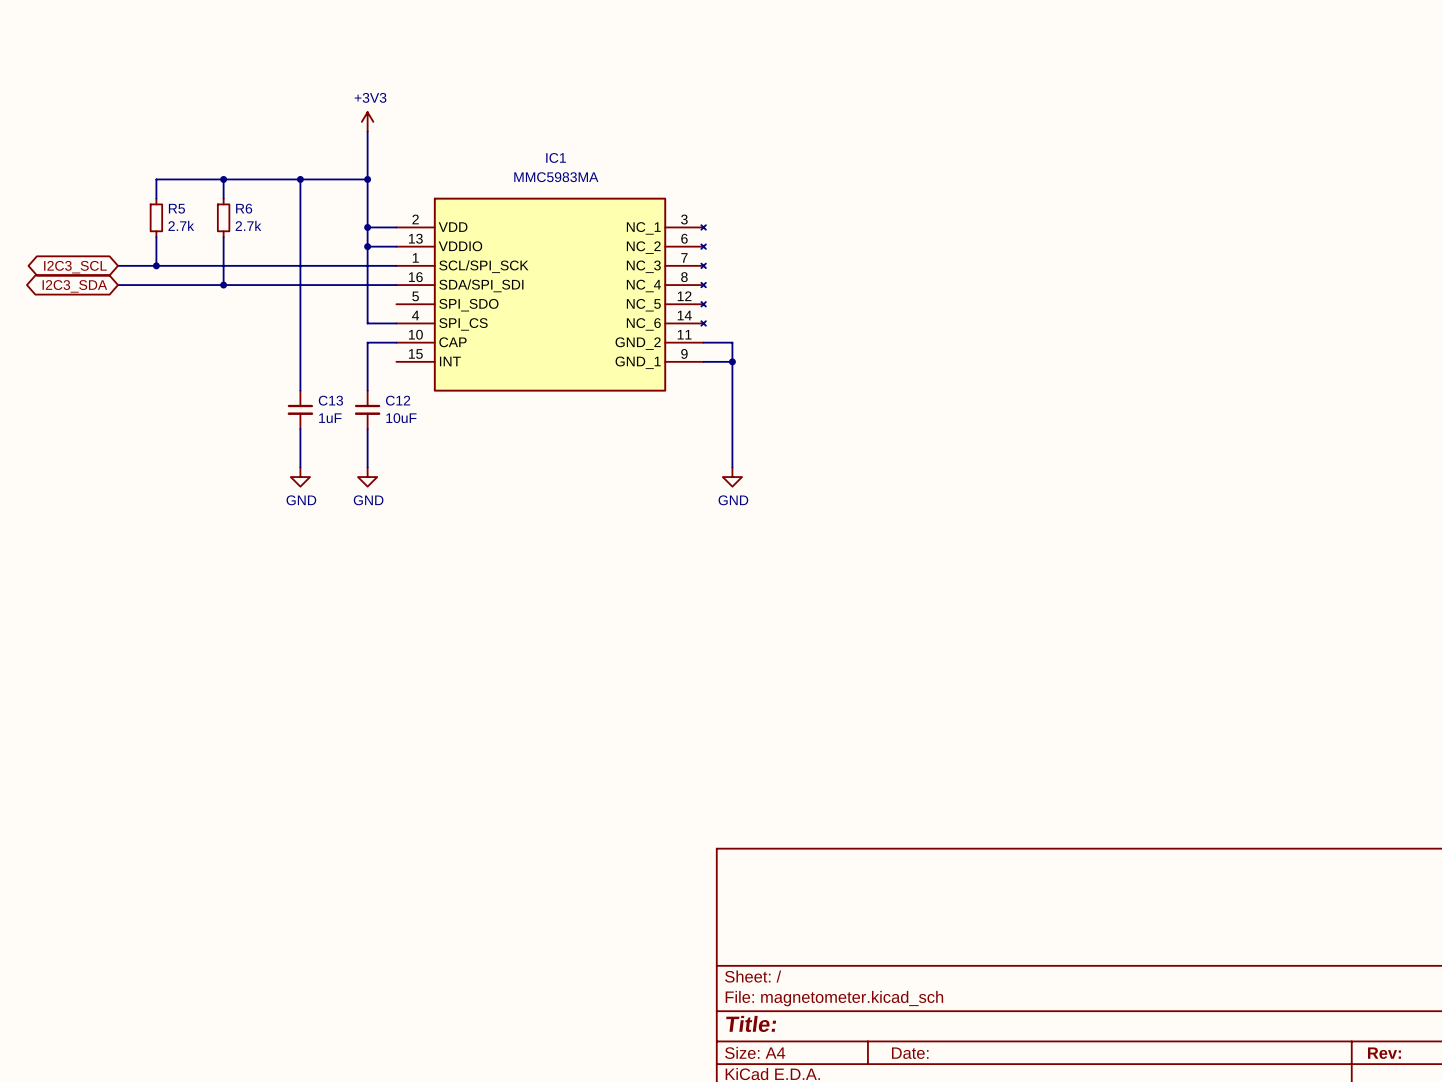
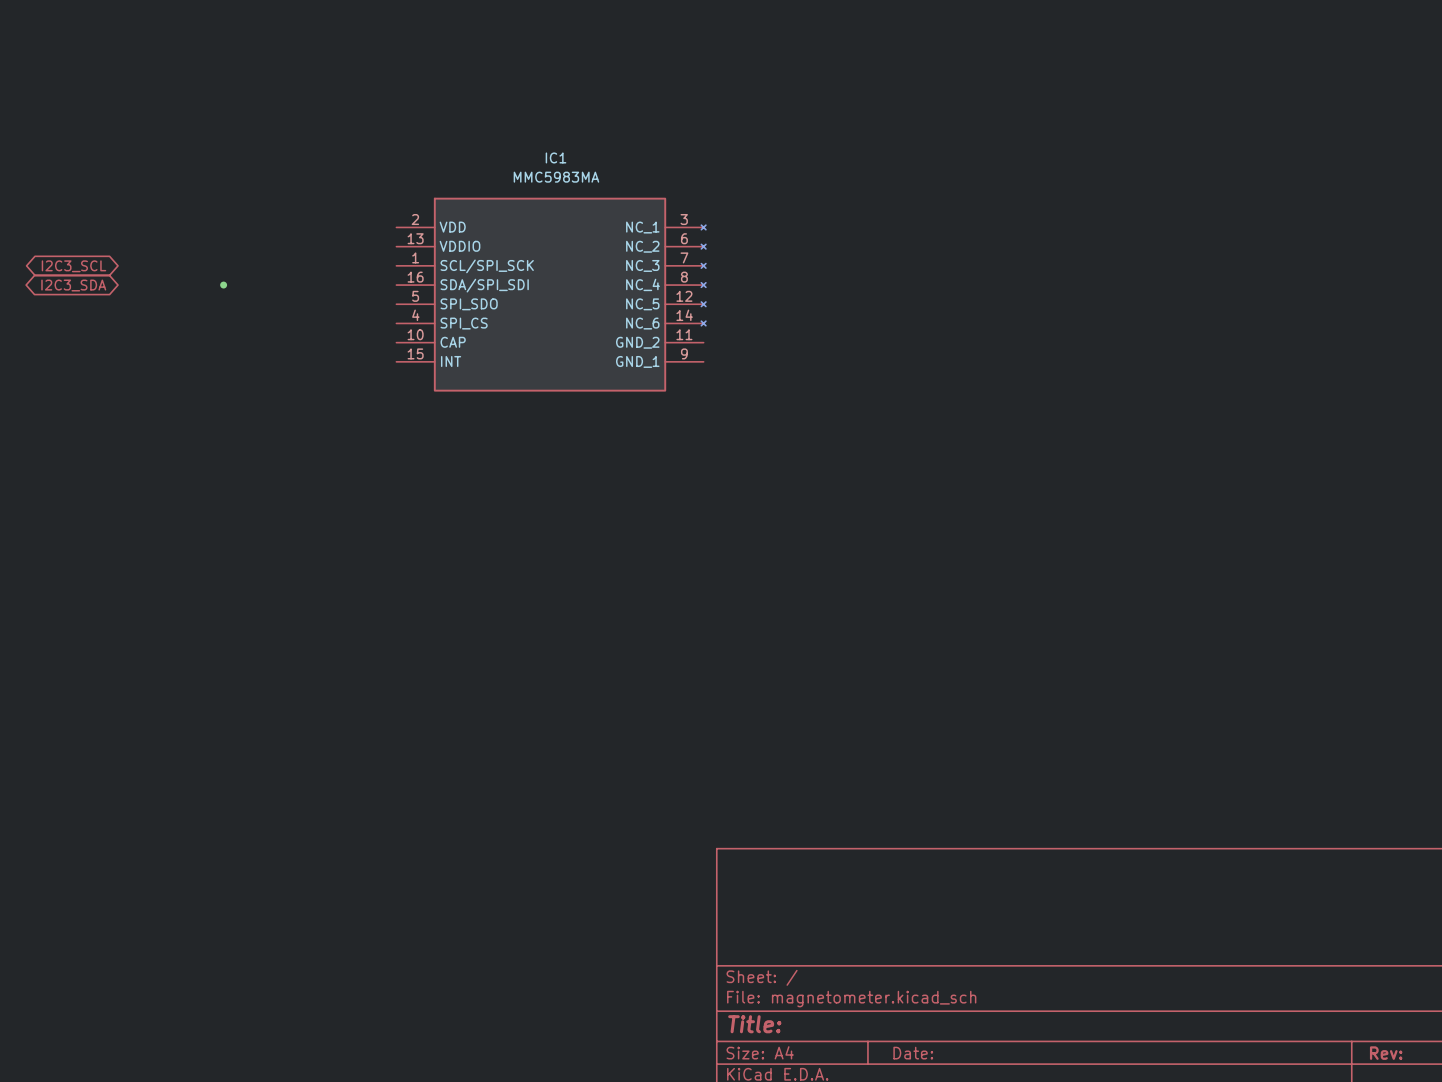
power symbol: +3V3 (367, 121) -> none
wire: (367, 131) (367, 323) (396, 323) -> none
wire: (223, 179) (223, 198) -> none
junction: (223, 179) -> none
wire: (300, 179) (300, 390) -> none
junction: (300, 179) -> none
wire: (367, 179) (156, 179) (156, 198) -> none
junction: (367, 179) -> none
R5: 2.7k (156, 217) -> none
R6: 2.7k (223, 217) -> none
wire: (367, 227) (396, 227) -> none
junction: (367, 227) -> none
wire: (156, 237) (156, 265) -> none
wire: (223, 237) (223, 285) -> none
wire: (367, 246) (396, 246) -> none
junction: (367, 246) -> none
wire: (118, 265) (396, 265) -> none
junction: (156, 265) -> none
wire: (118, 285) (396, 285) -> none
wire: (396, 342) (367, 342) (367, 390) -> none
wire: (703, 342) (732, 342) (732, 467) -> none
wire: (703, 361) (732, 361) -> none
junction: (732, 361) -> none
C13: 1uF (300, 409) -> none
C12: 10uF (367, 409) -> none
wire: (300, 429) (300, 467) -> none
wire: (367, 429) (367, 467) -> none
power symbol: GND (300, 477) -> none
power symbol: GND (367, 477) -> none
power symbol: GND (732, 477) -> none

